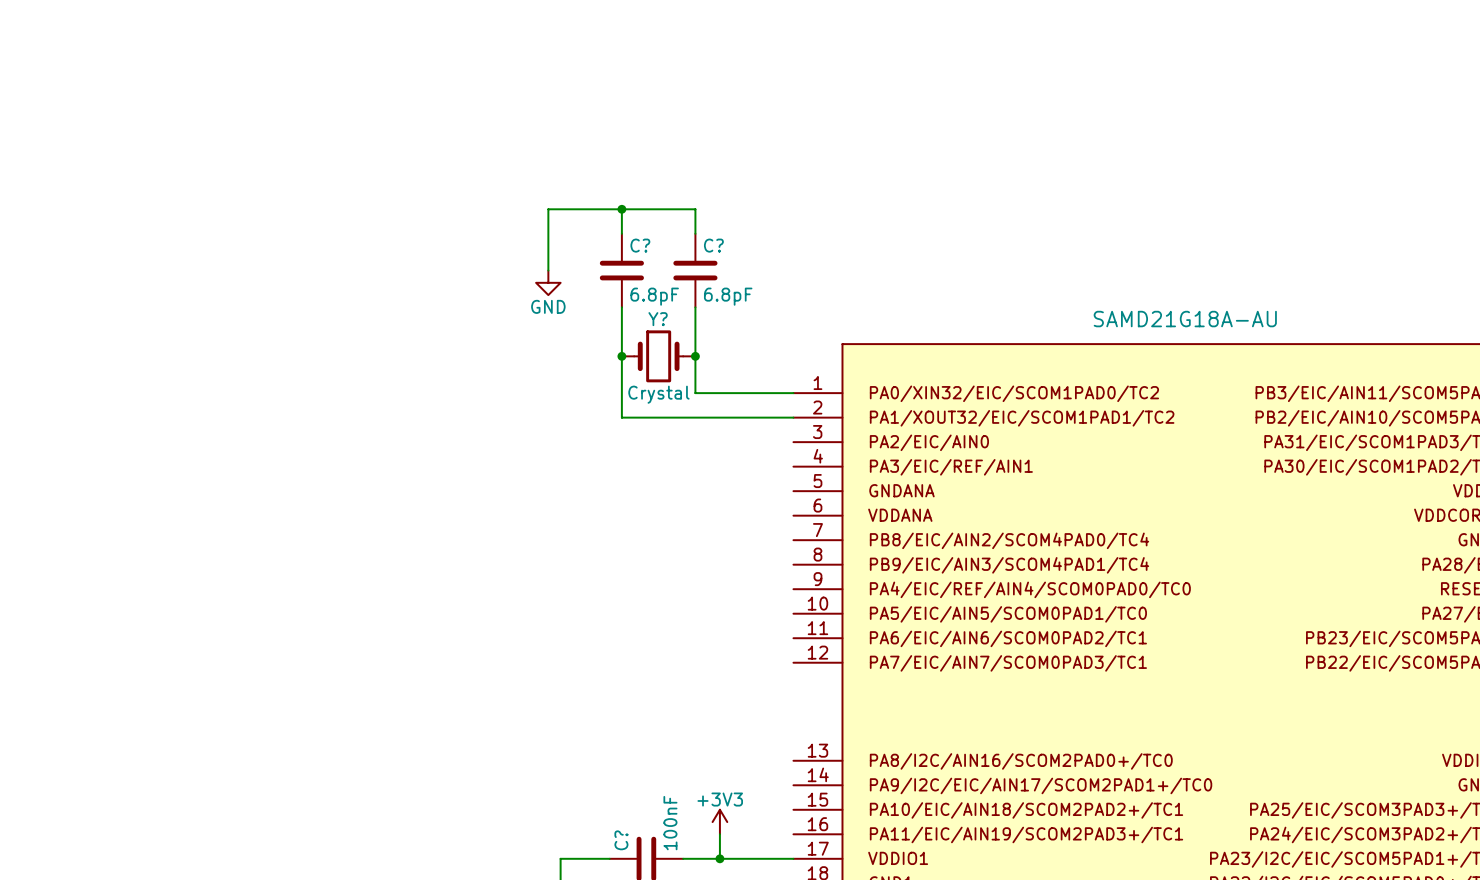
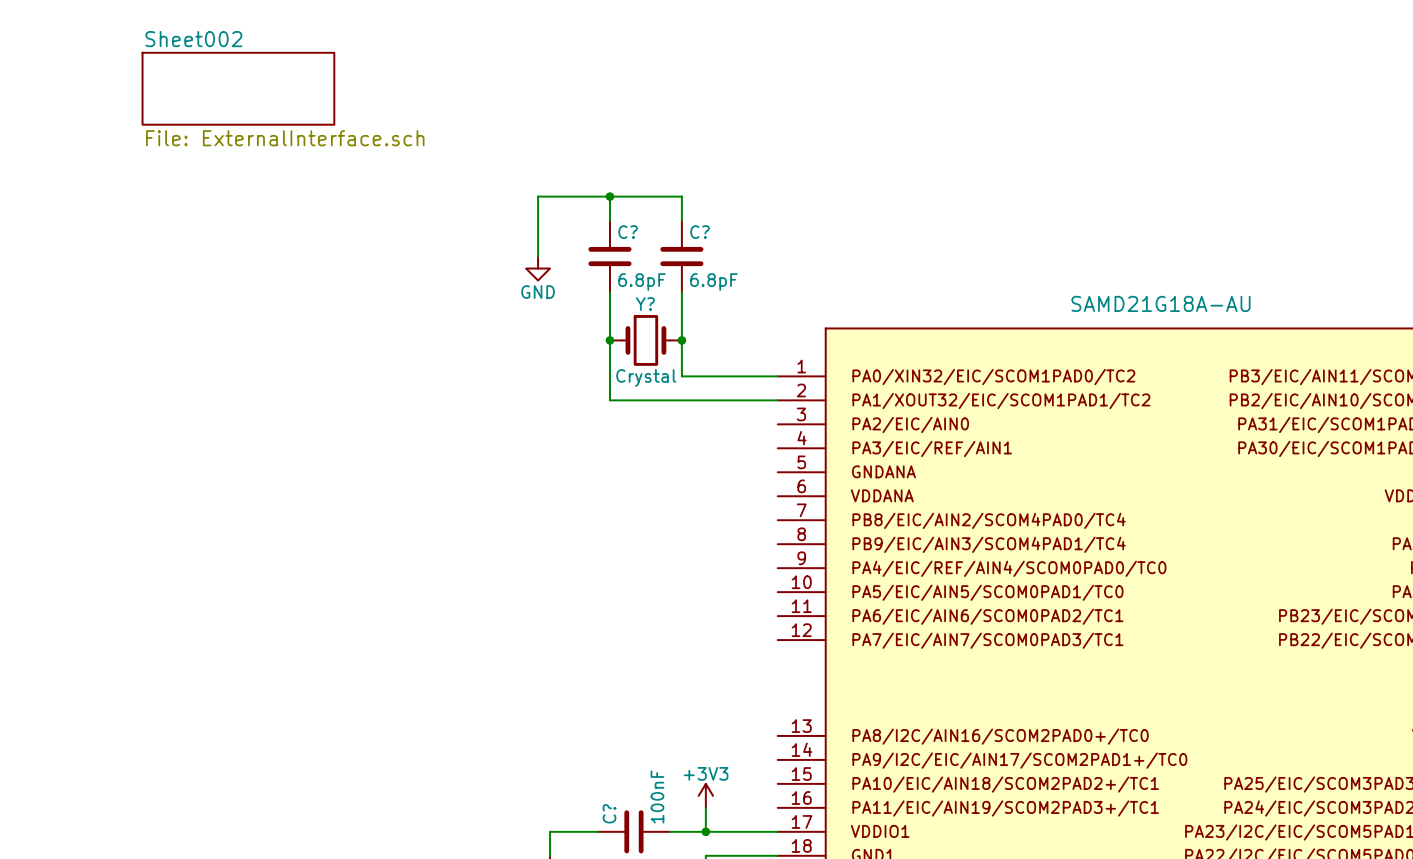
sheet Sheet002: none -> File: ExternalInterface.sch (238, 88)

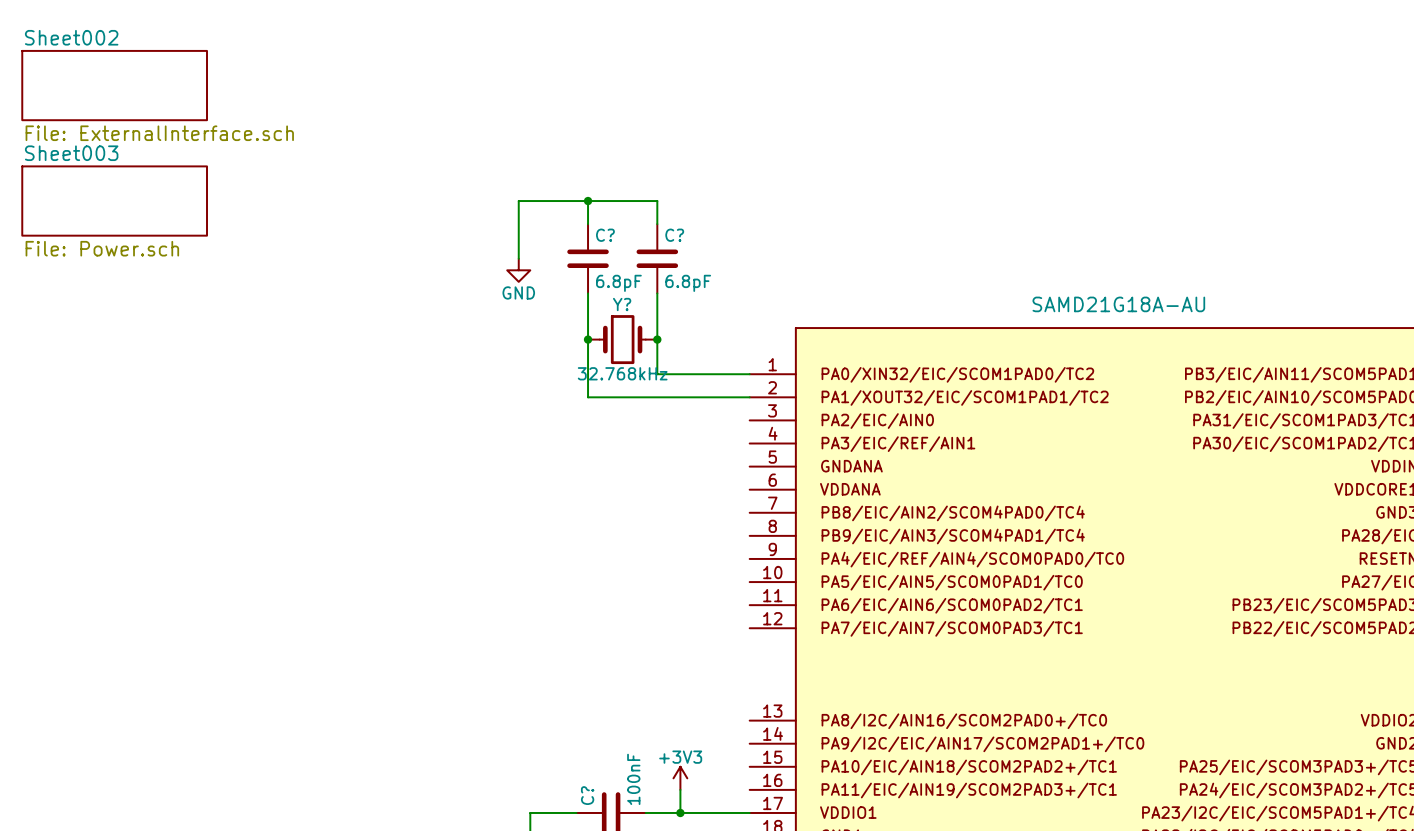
sheet Sheet002 position: (238, 88) -> (114, 85)
sheet Sheet003: none -> File: Power.sch (114, 201)
Y? value: Crystal (646, 377) -> 32.768kHz (622, 373)

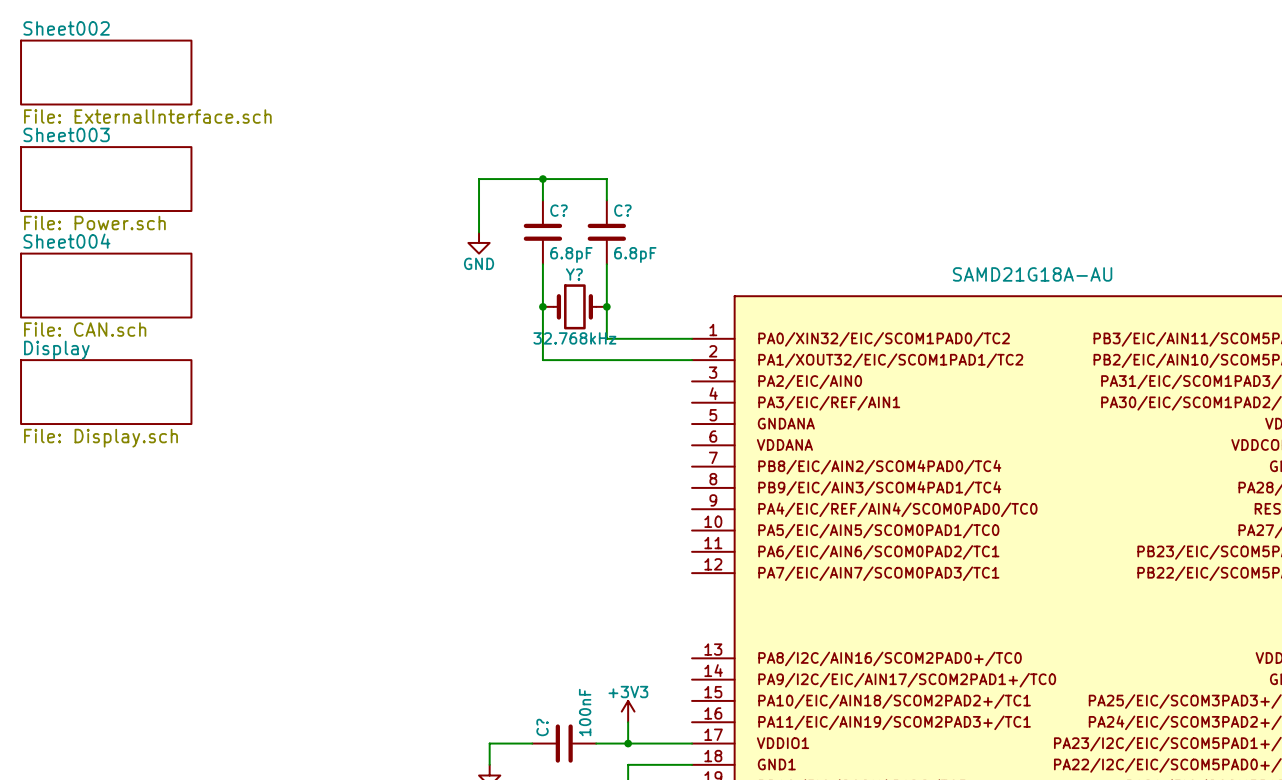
sheet Sheet004: none -> File: CAN.sch (106, 285)
sheet Display: none -> File: Display.sch (106, 392)

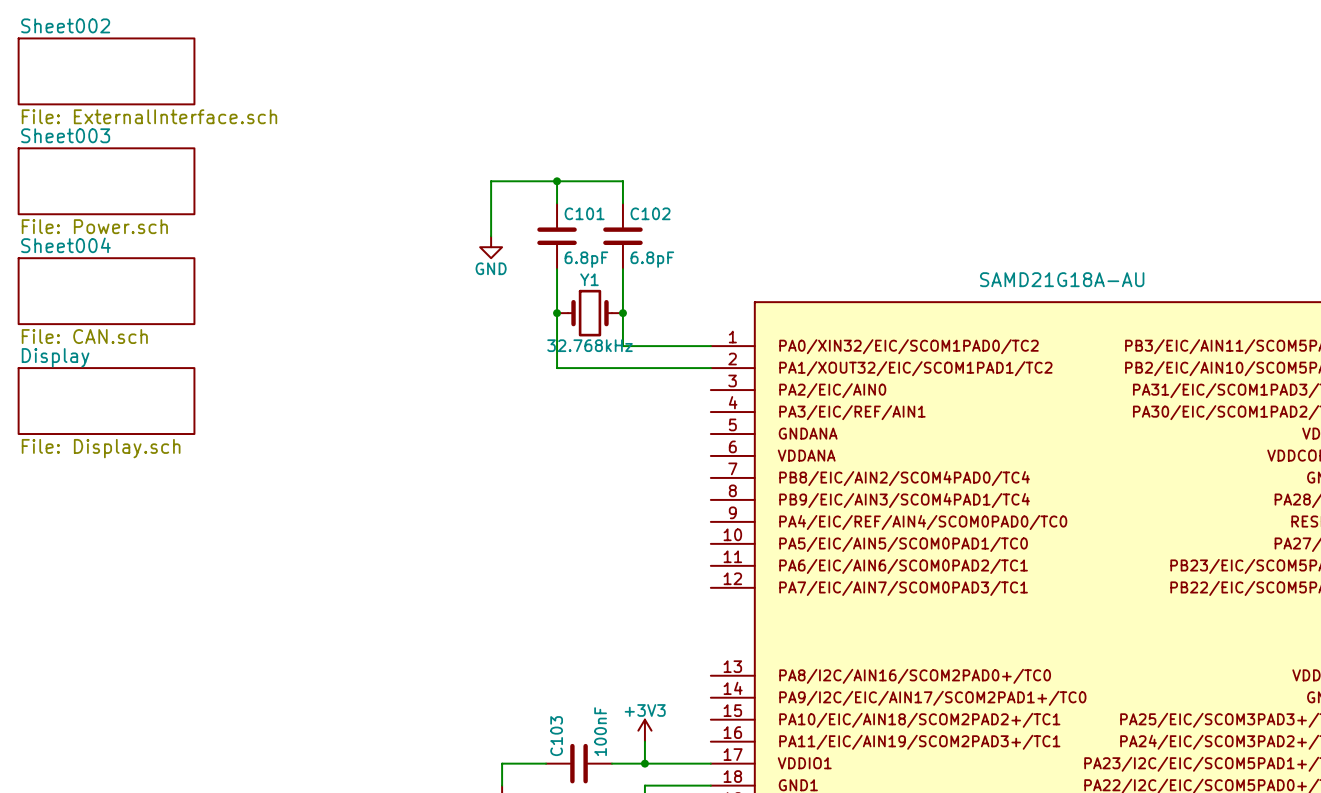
C? name: C? (558, 210) -> C101 (584, 213)
C? name: C? (622, 210) -> C102 (650, 213)
Y? name: Y? (574, 274) -> Y1 (589, 279)
C? name: C? (542, 727) -> C103 (556, 736)

